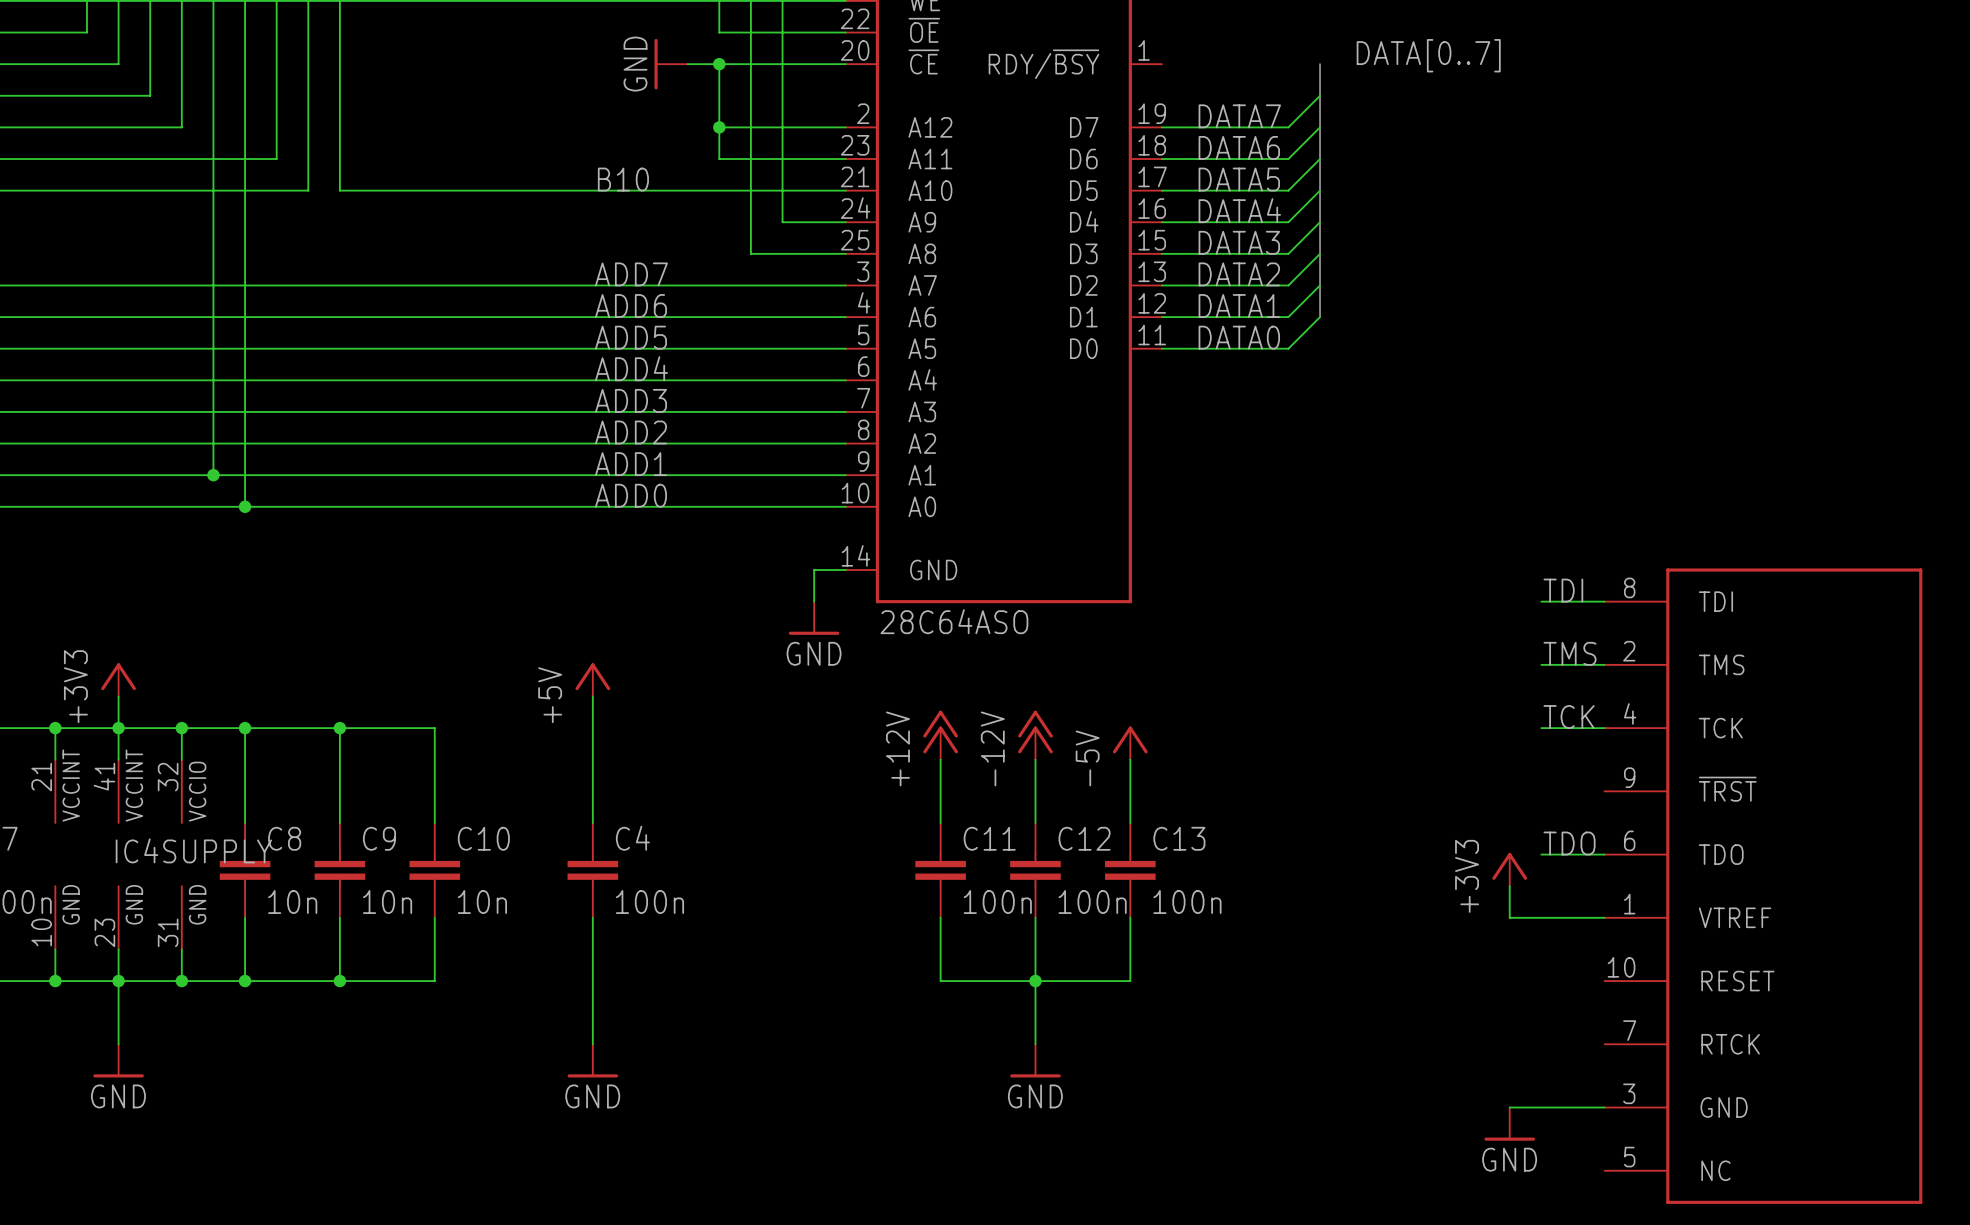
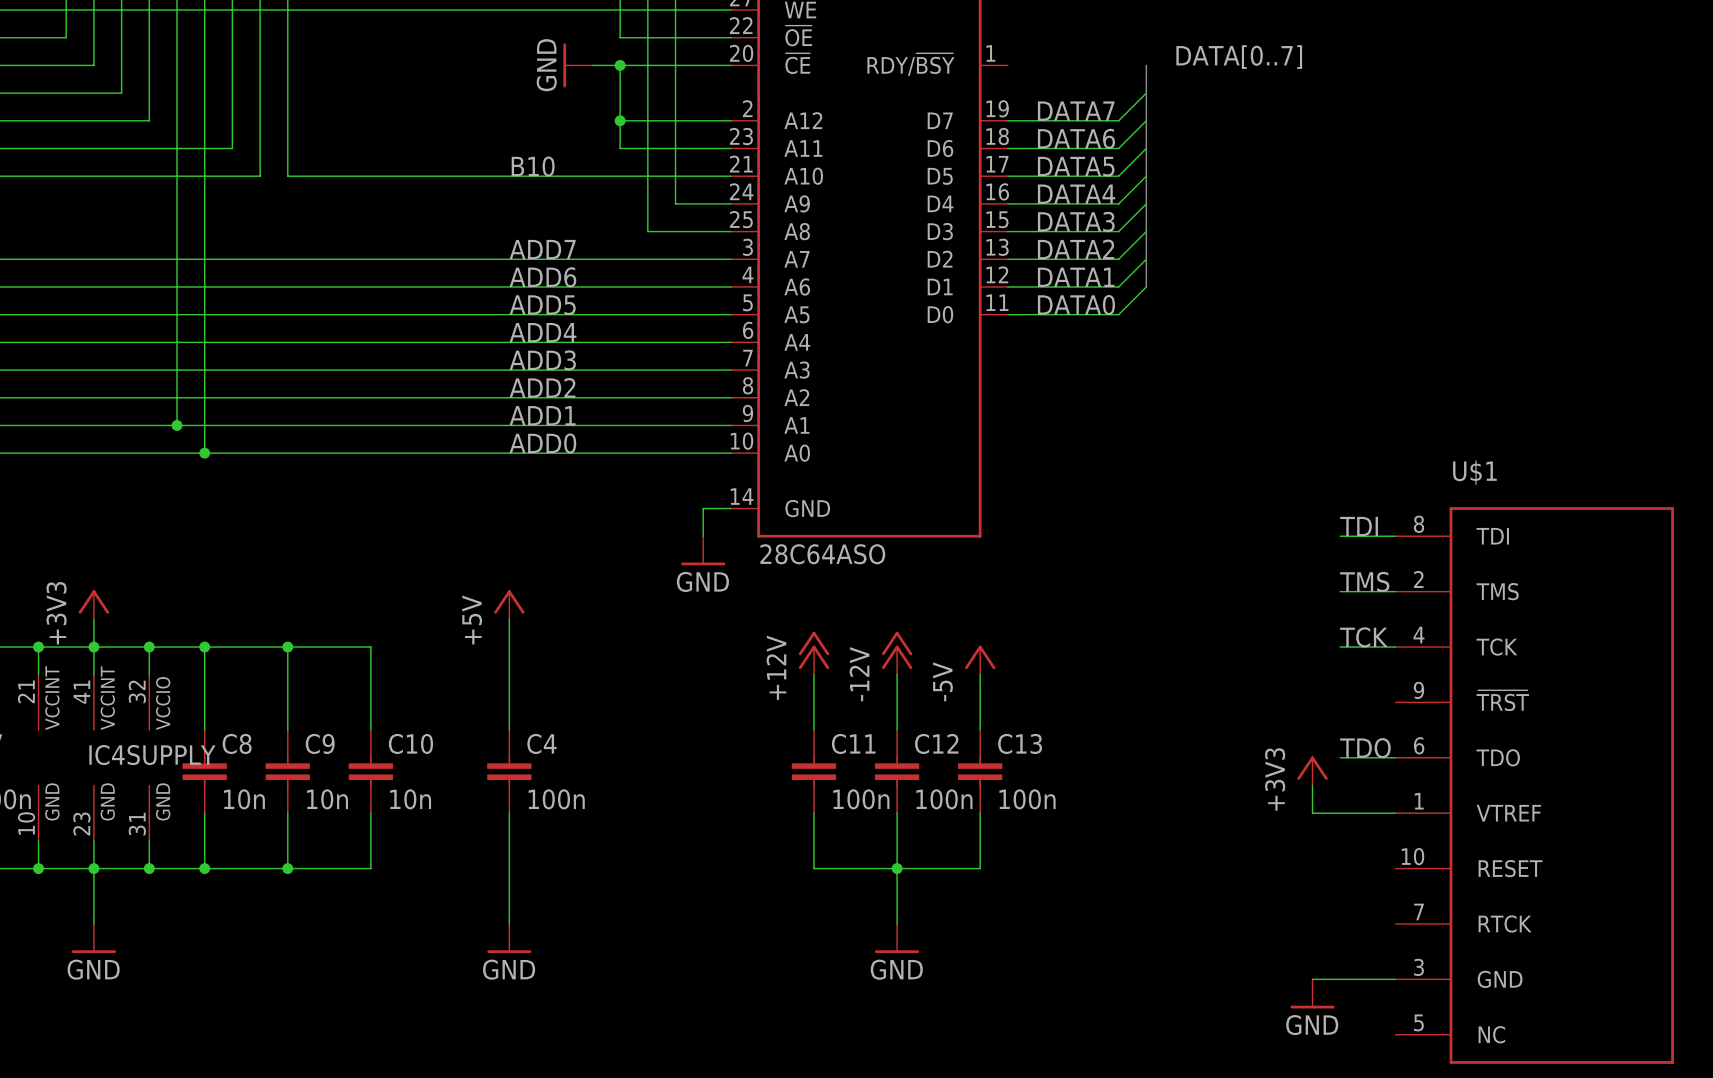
U$1 name: none -> U$1 (1474, 472)

